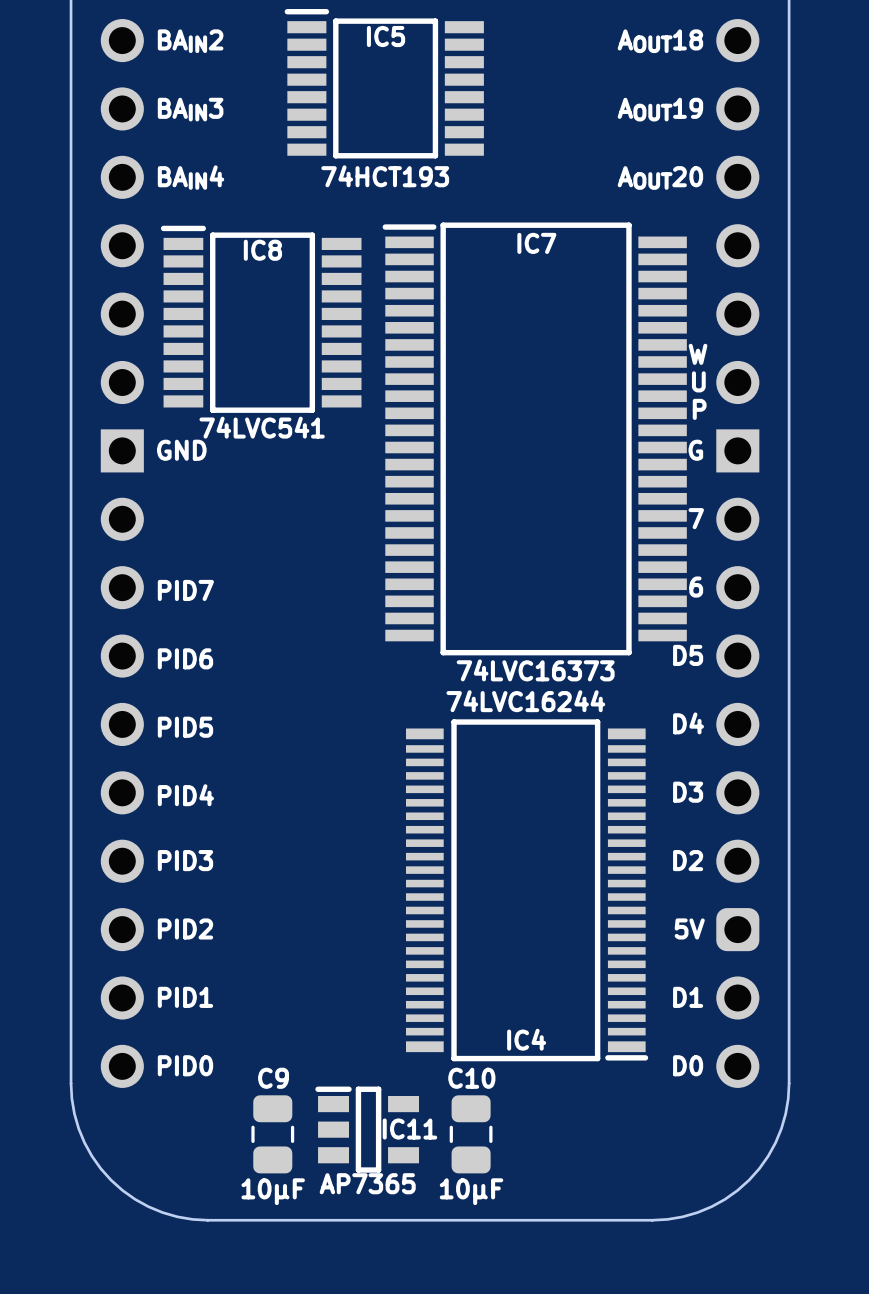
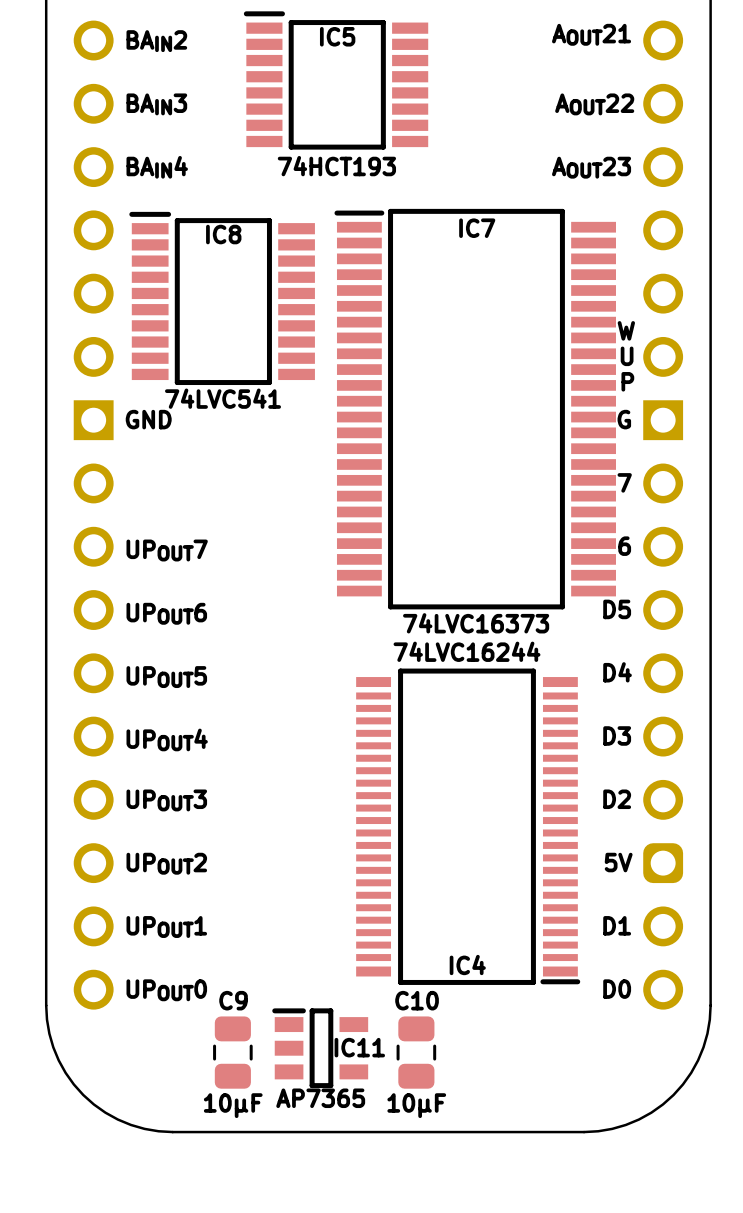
text: AOUT18 (660, 41) -> AOUT21 (591, 34)
text: AOUT19 (660, 109) -> AOUT22 (594, 104)
text: AOUT20 (660, 177) -> AOUT23 (591, 167)
text: PID7 (185, 590) -> UPOUT7 (167, 550)
text: PID6 (185, 658) -> UPOUT6 (166, 613)
text: PID5 (185, 727) -> UPOUT5 (166, 677)
text: PID4 (185, 795) -> UPOUT4 (167, 739)
text: PID3 (185, 860) -> UPOUT3 (166, 800)
text: PID2 (185, 928) -> UPOUT2 (166, 863)
text: PID1 (185, 997) -> UPOUT1 (166, 927)
text: PID0 (185, 1065) -> UPOUT0 (166, 990)

